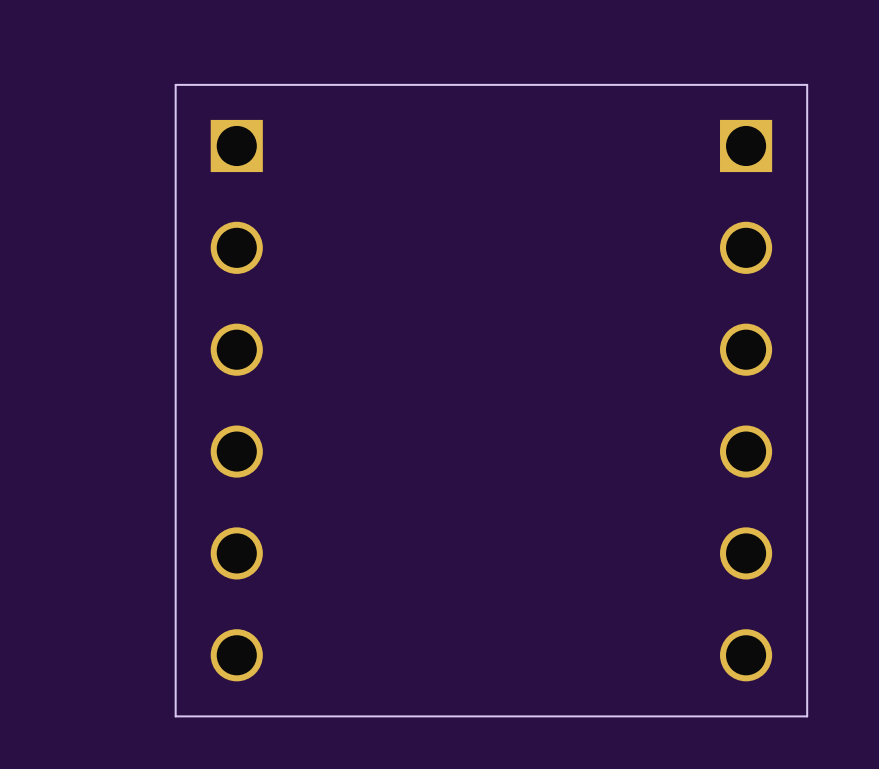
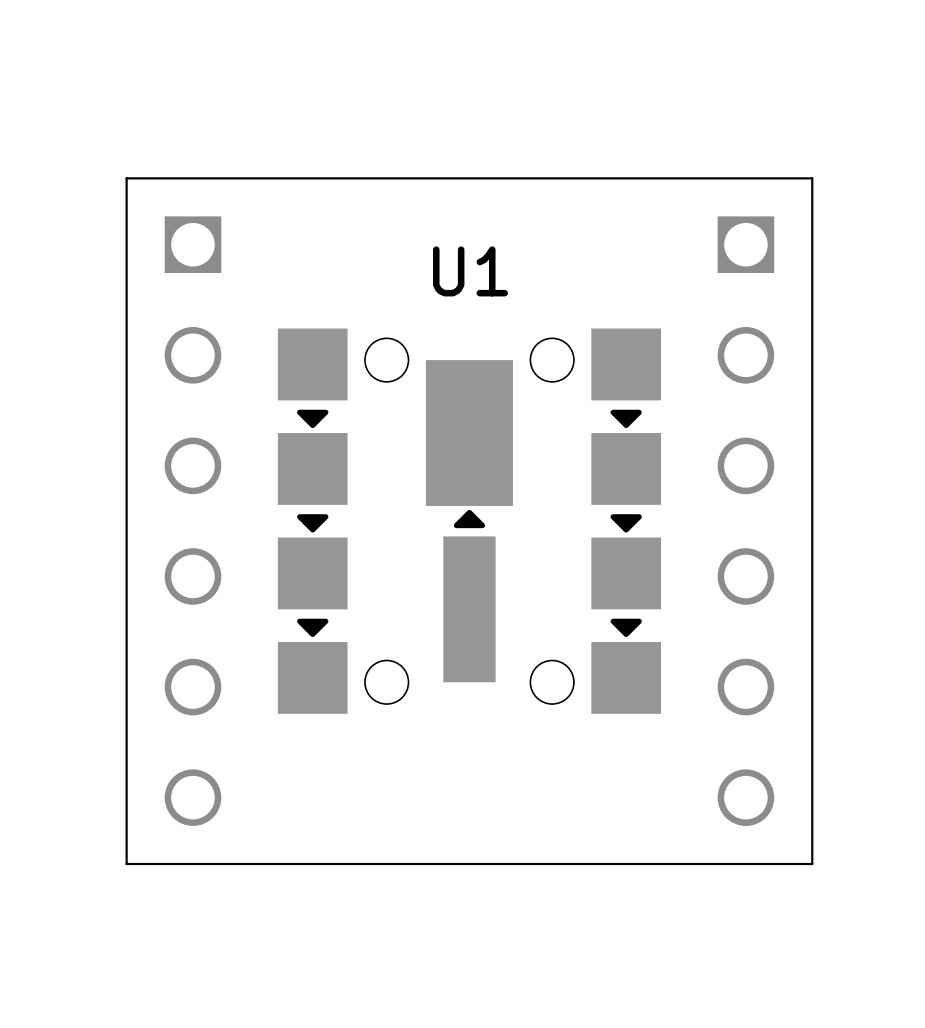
U1: none -> (469, 521)

